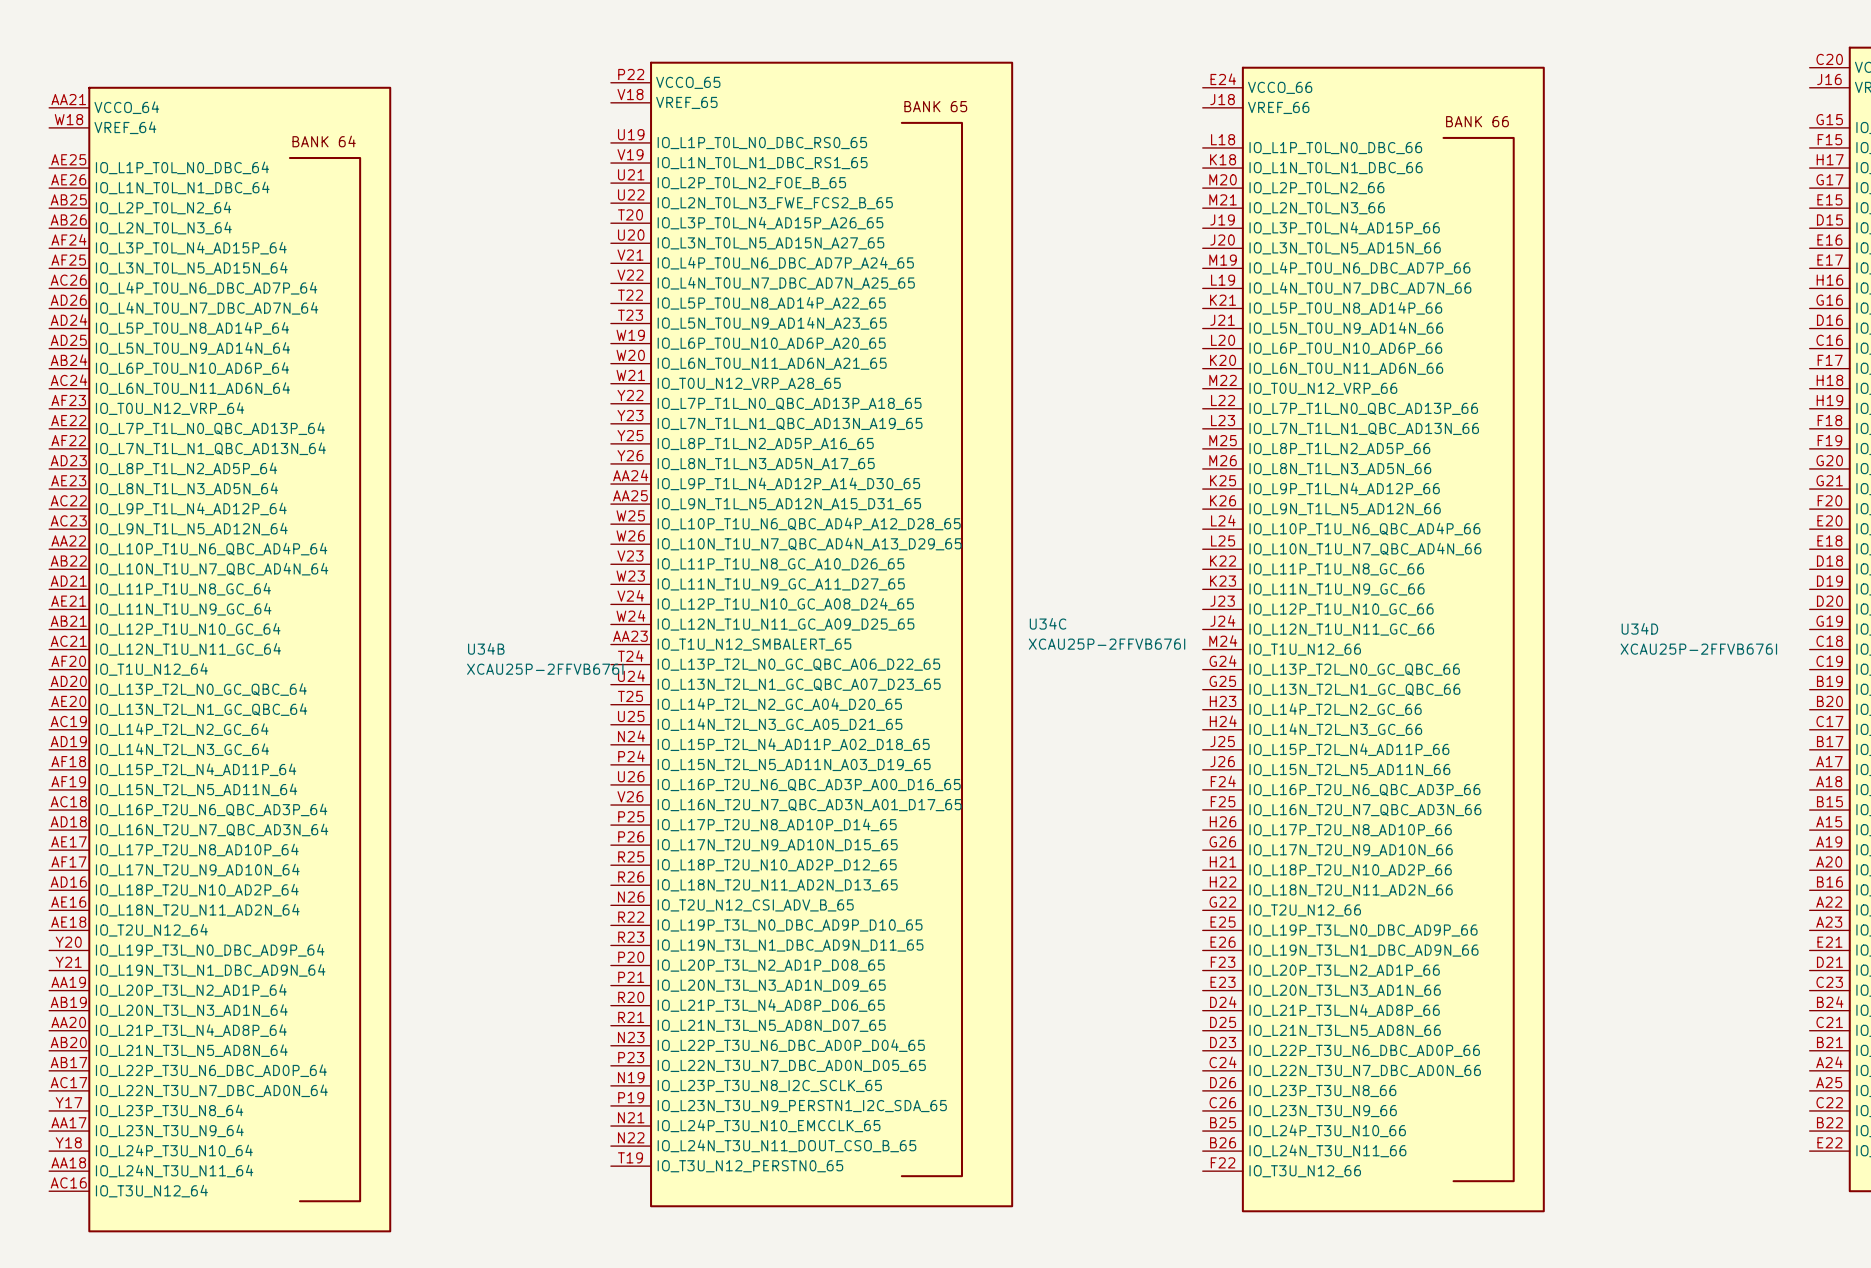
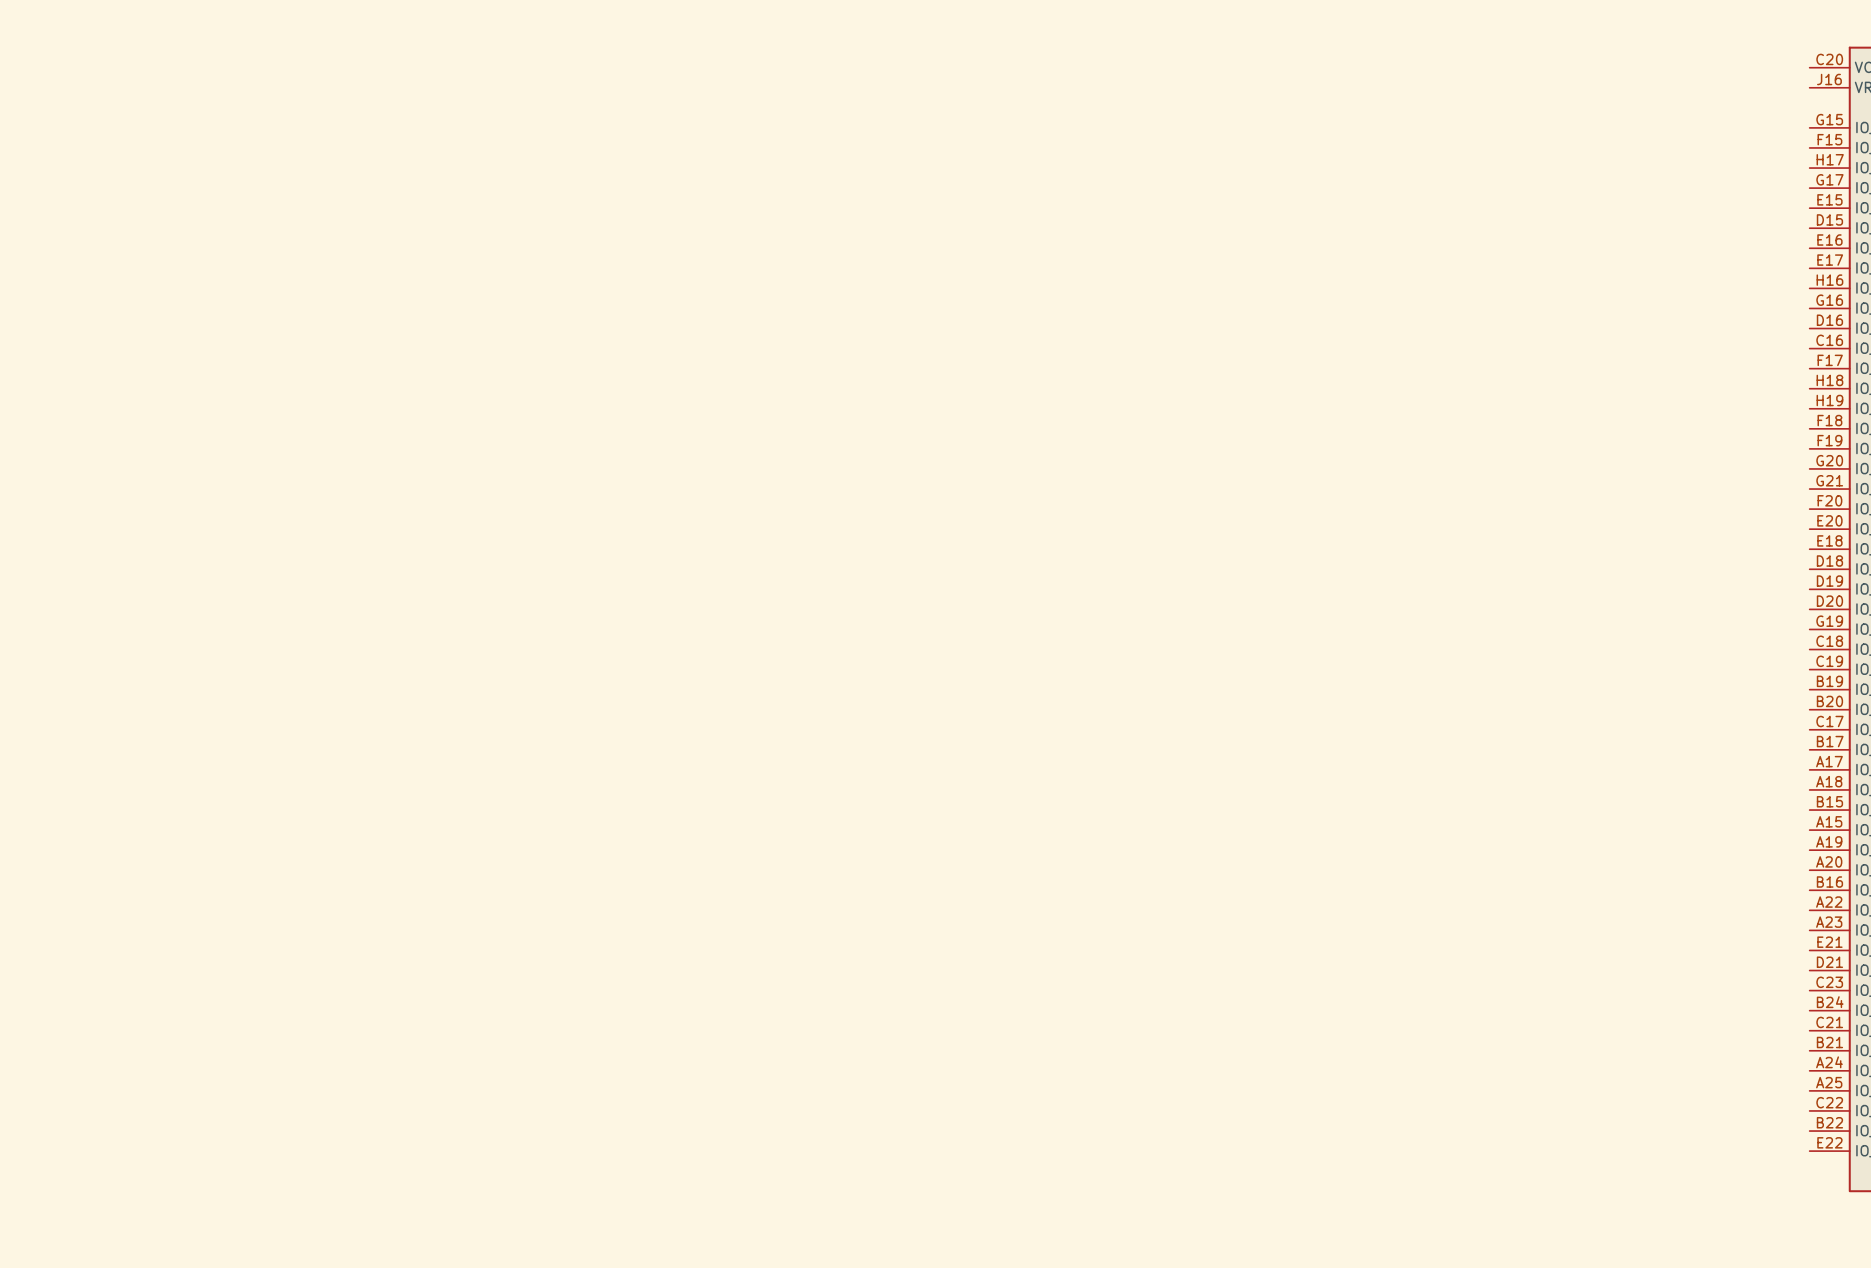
U34C: (812, 634) -> none
U34D: (1373, 639) -> none
U34B: (220, 659) -> none

